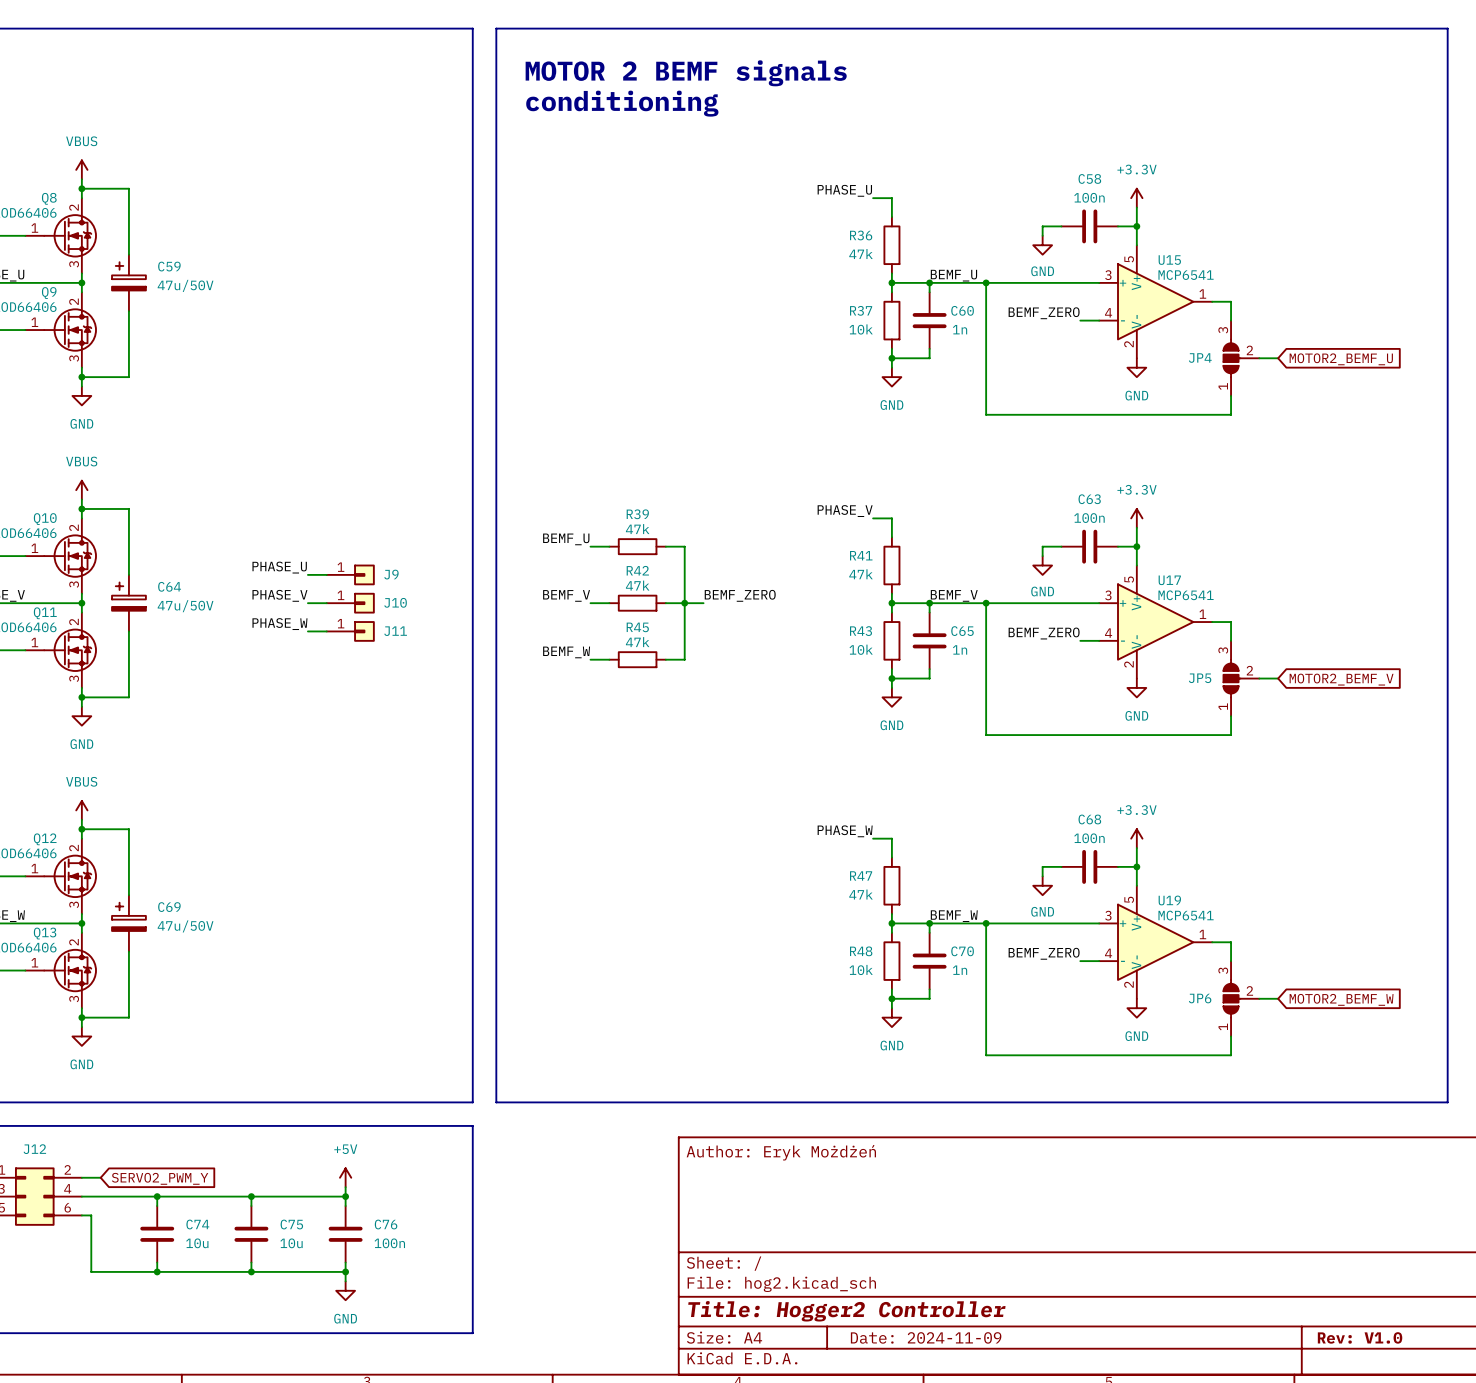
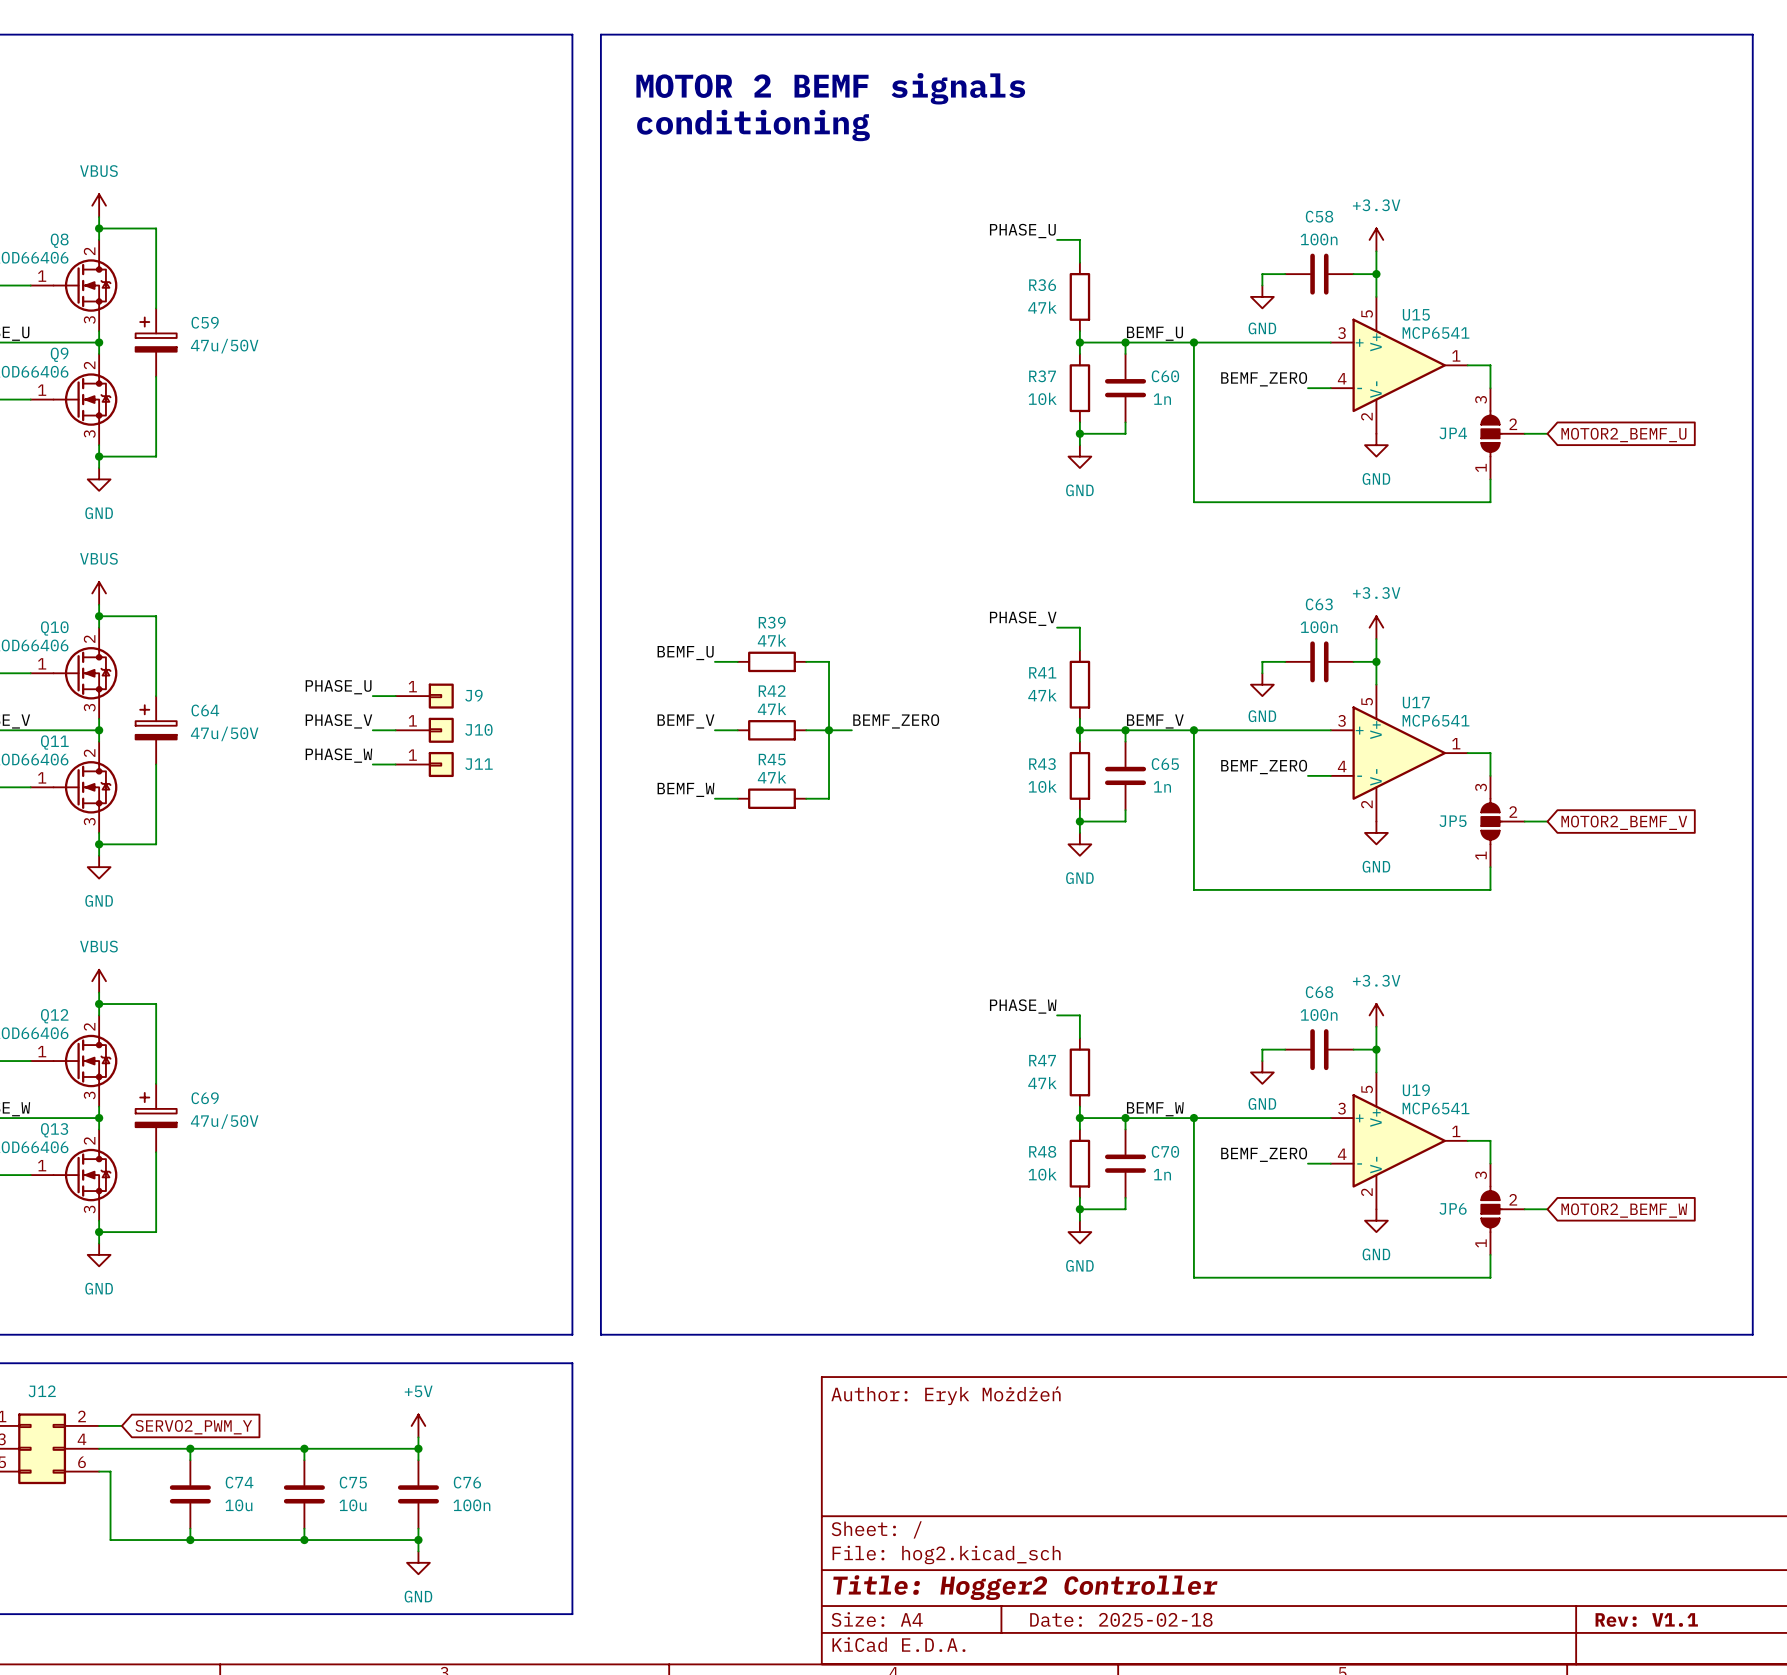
title block: Date: 2024-11-09 (926, 1337) -> Date: 2025-02-18 (1121, 1619)
title block: Rev: V1.0 (1360, 1337) -> Rev: V1.1 (1646, 1619)

